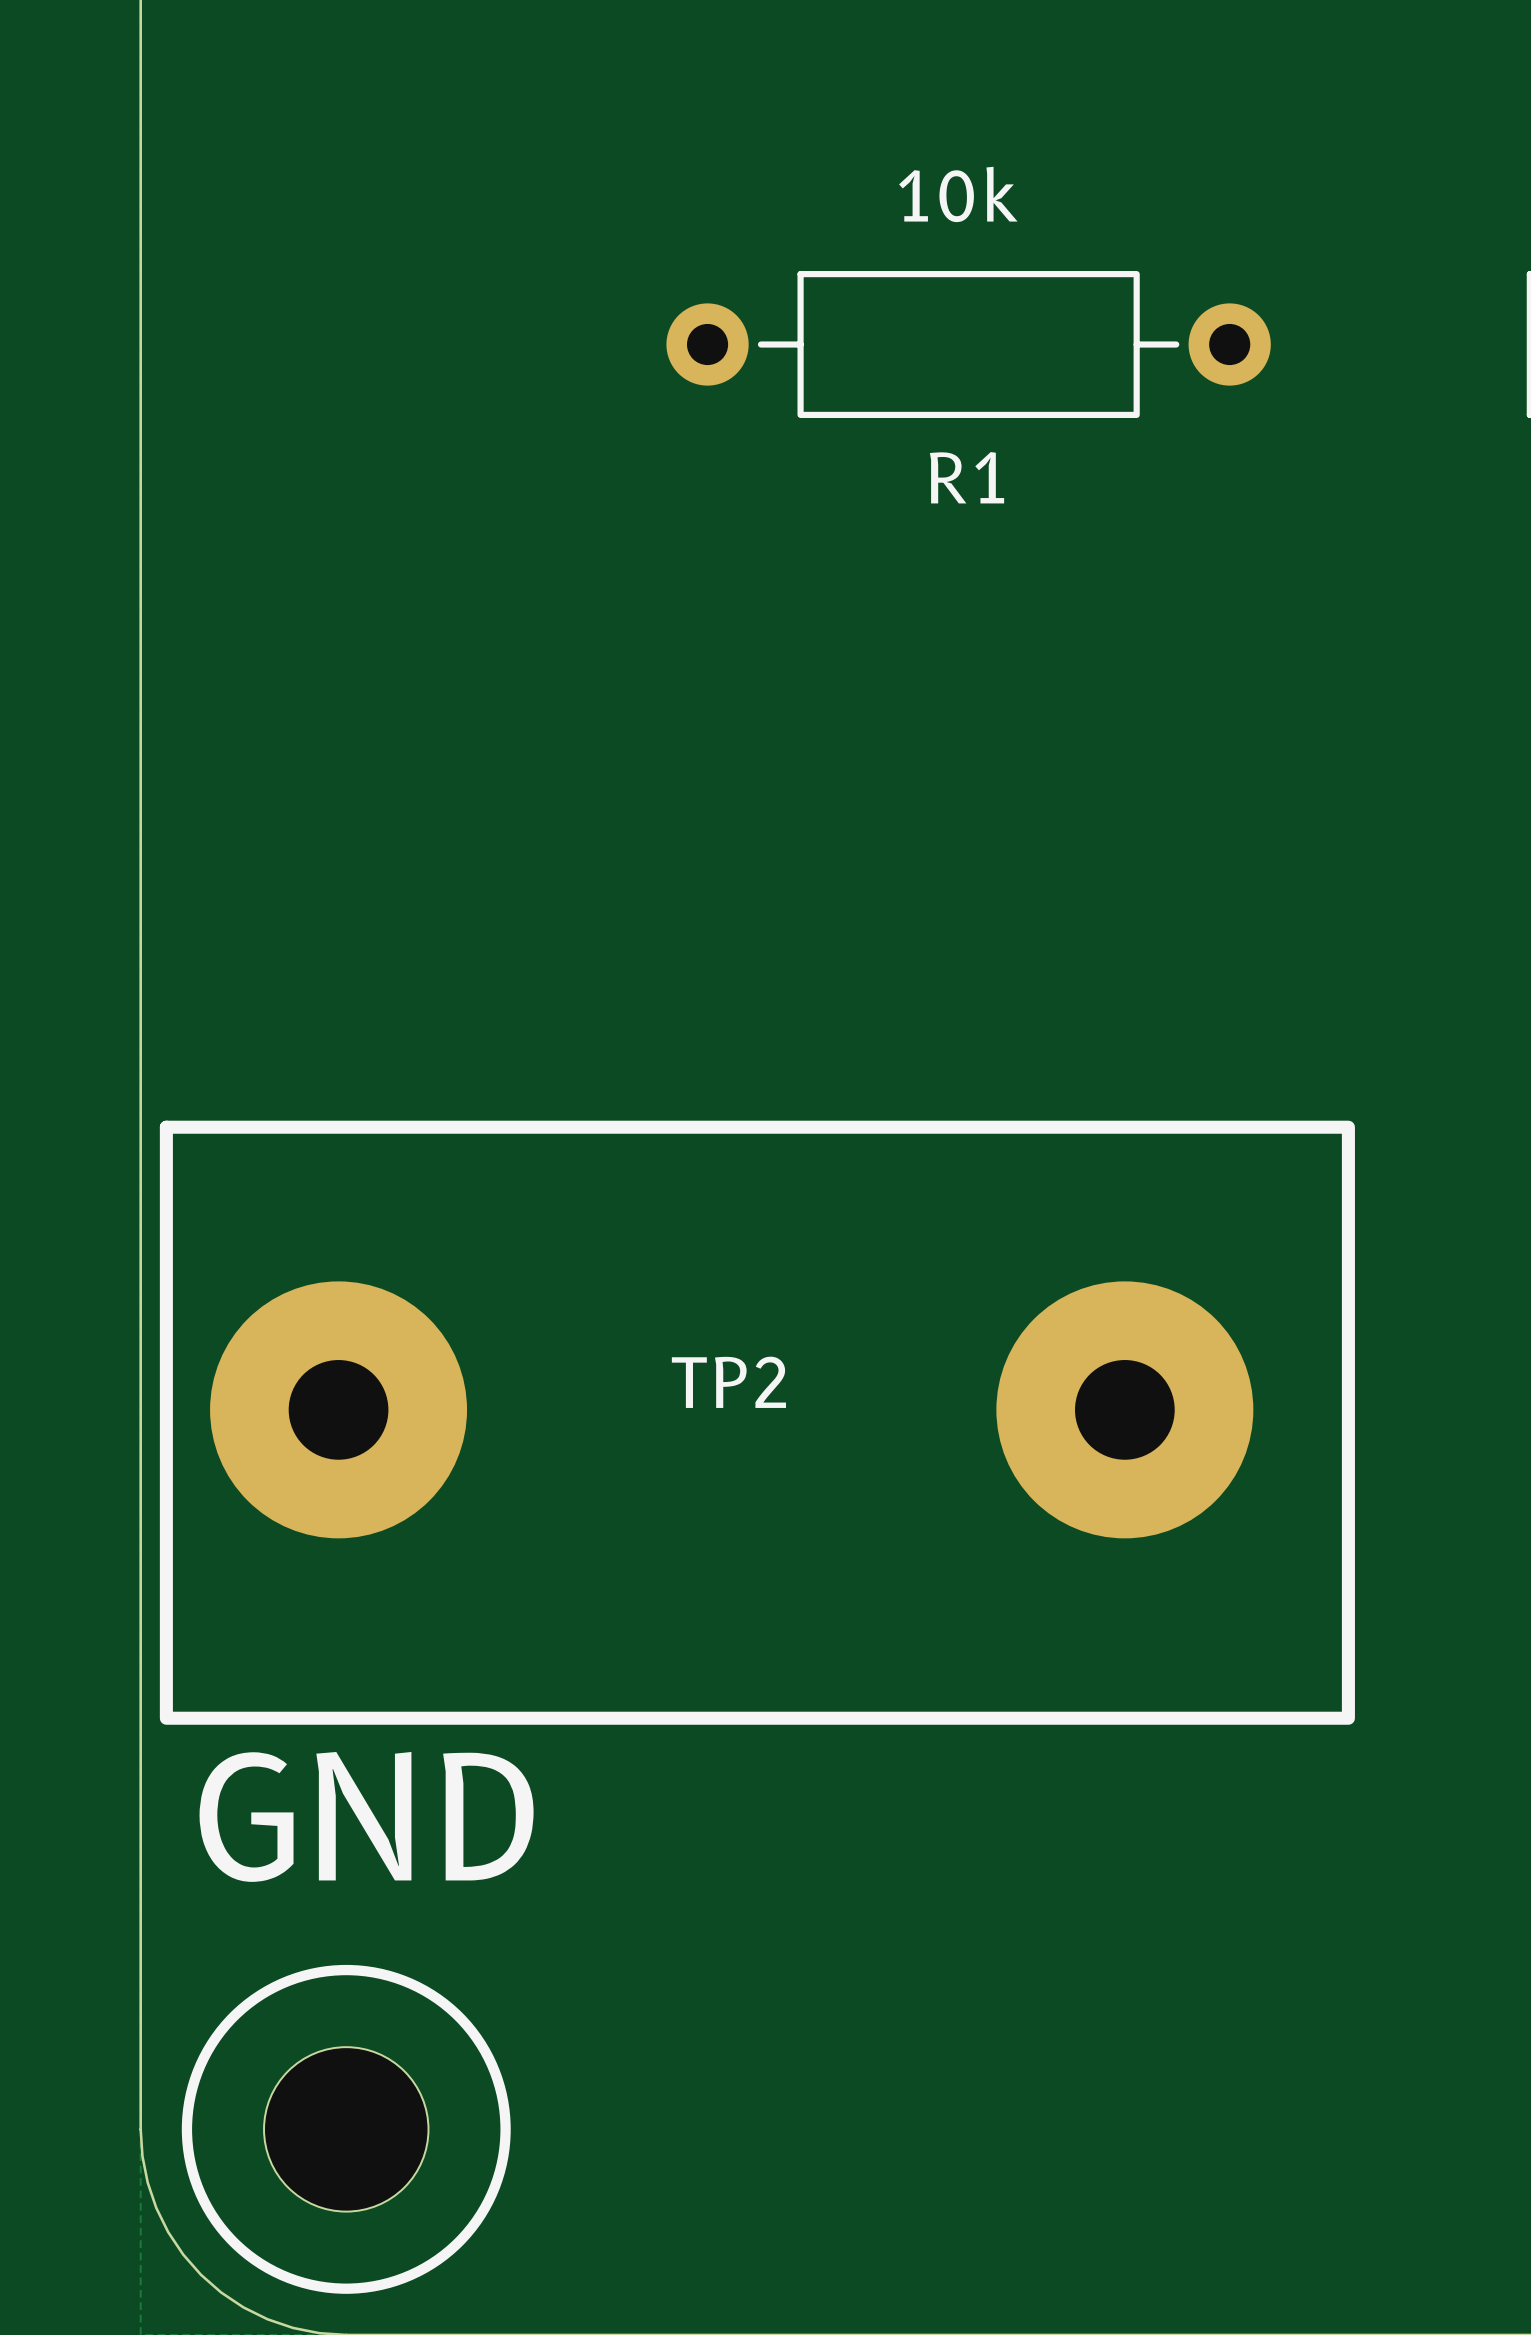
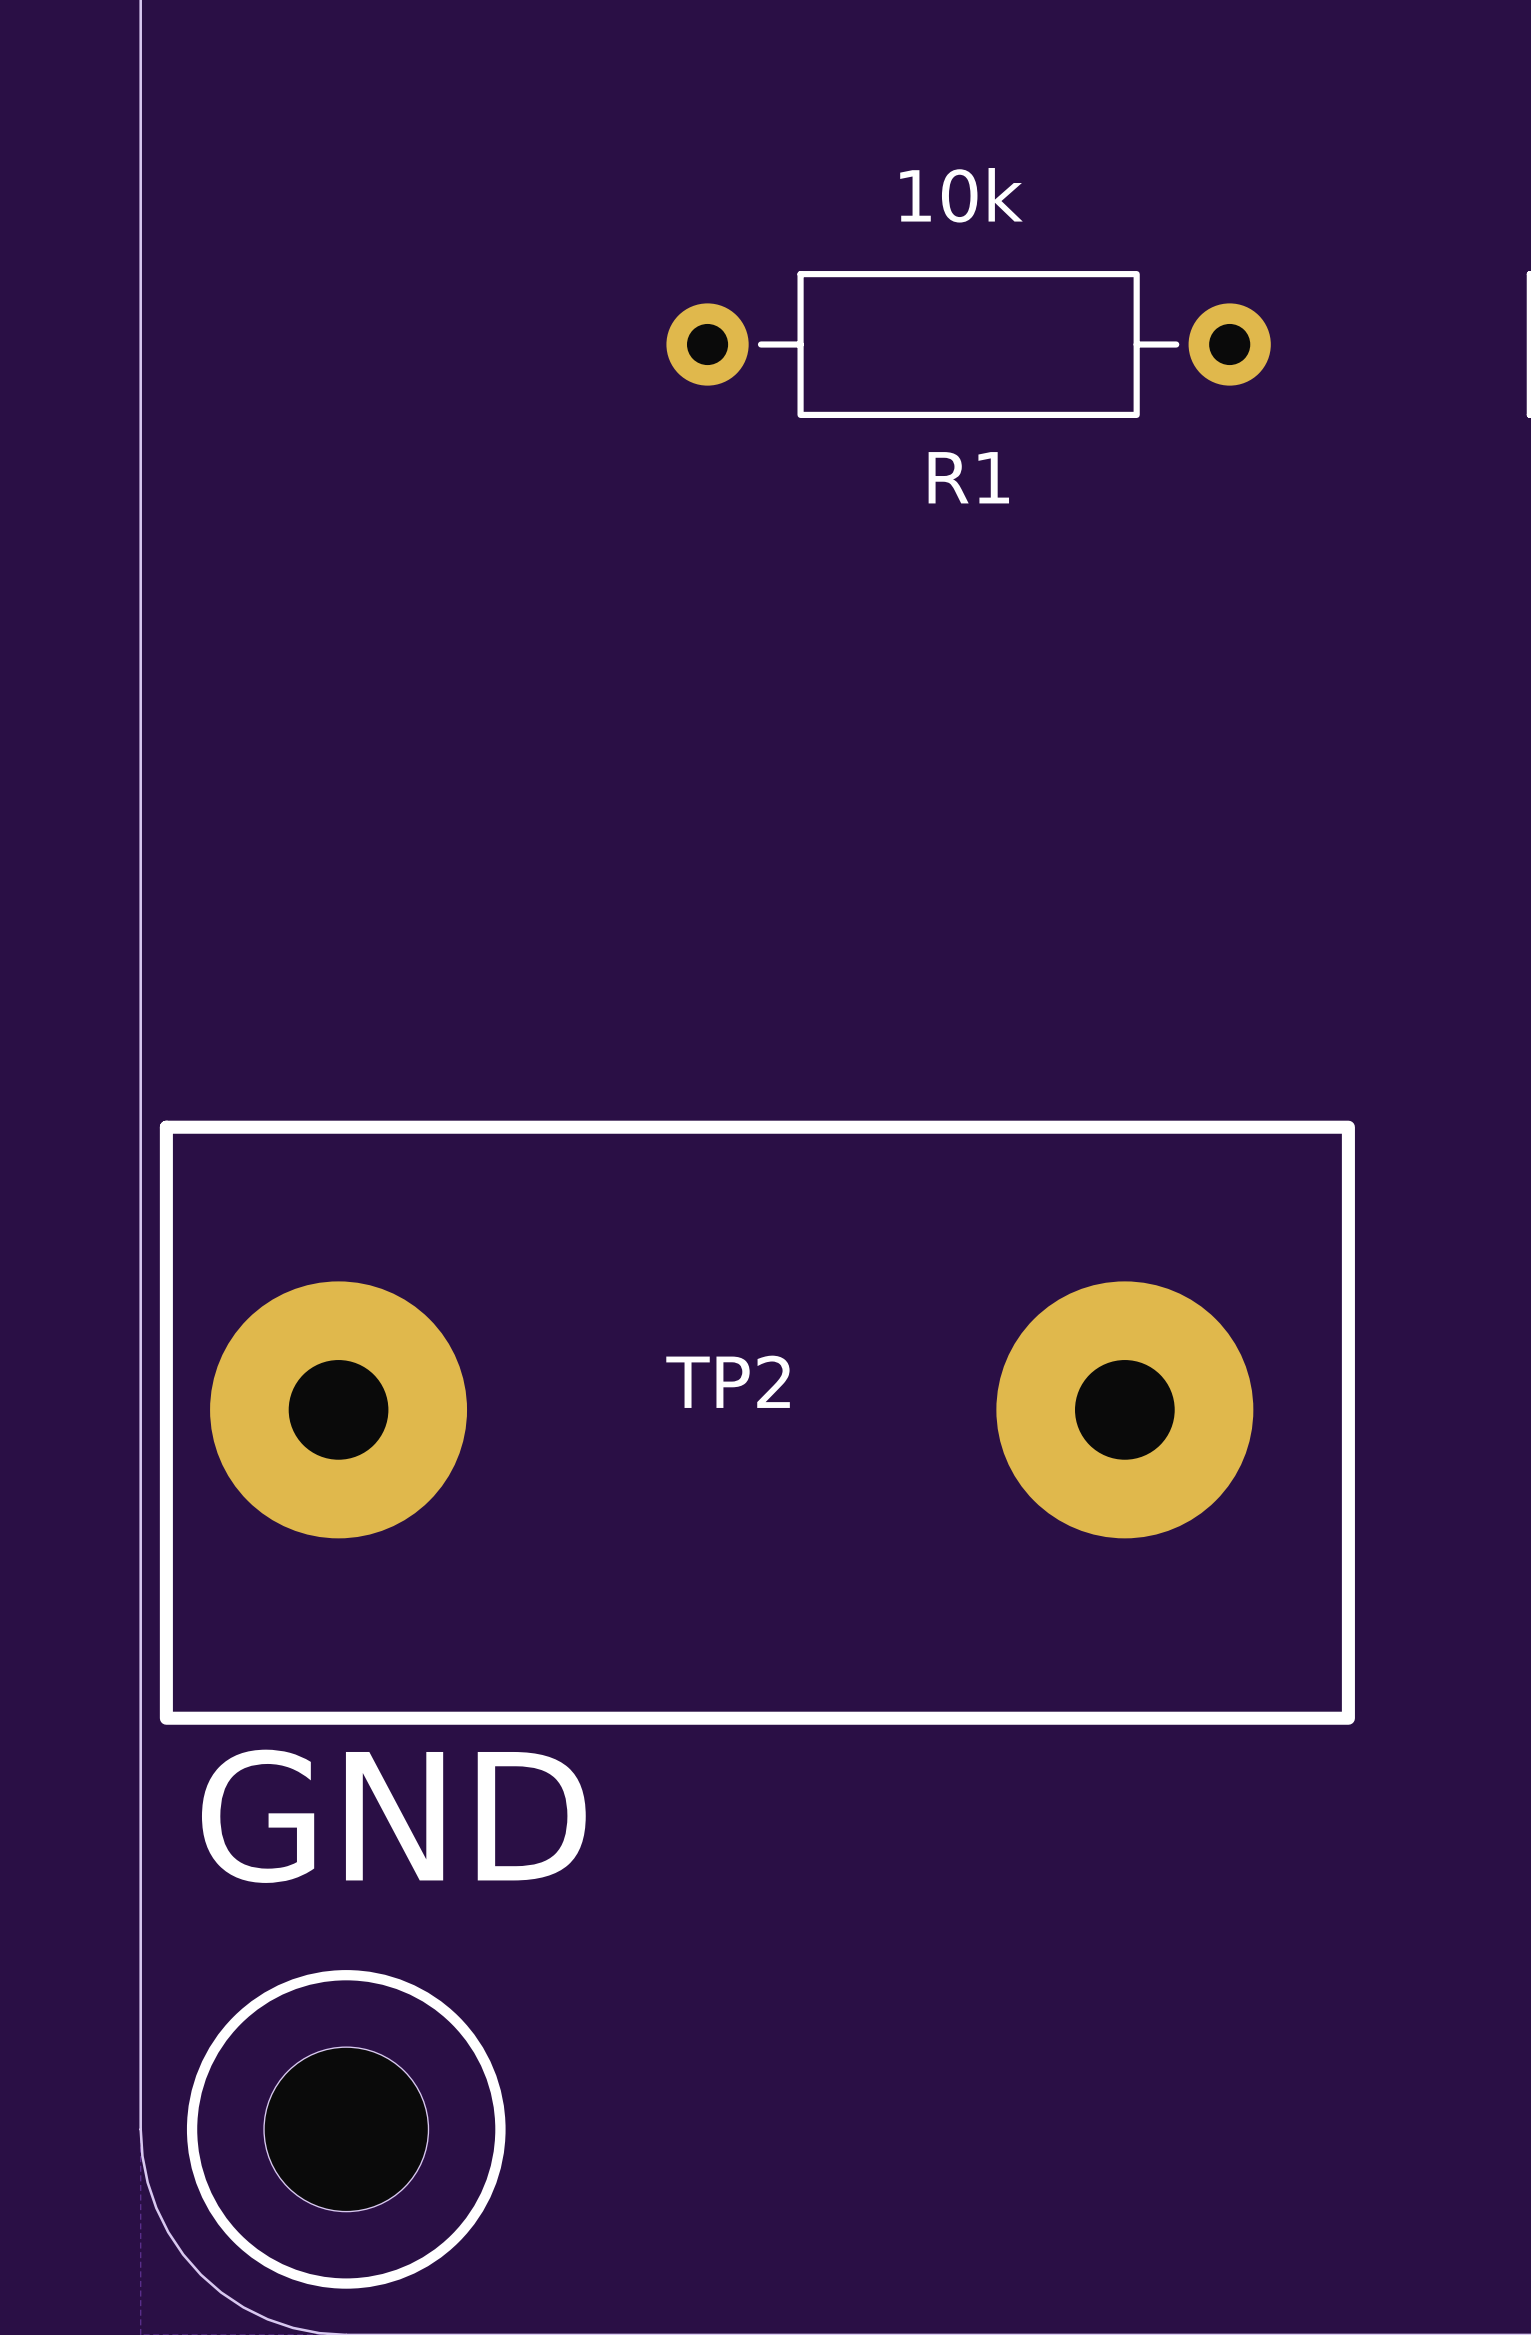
drawing shape: [181, 1964, 511, 2294] -> [186, 1970, 506, 2289]

